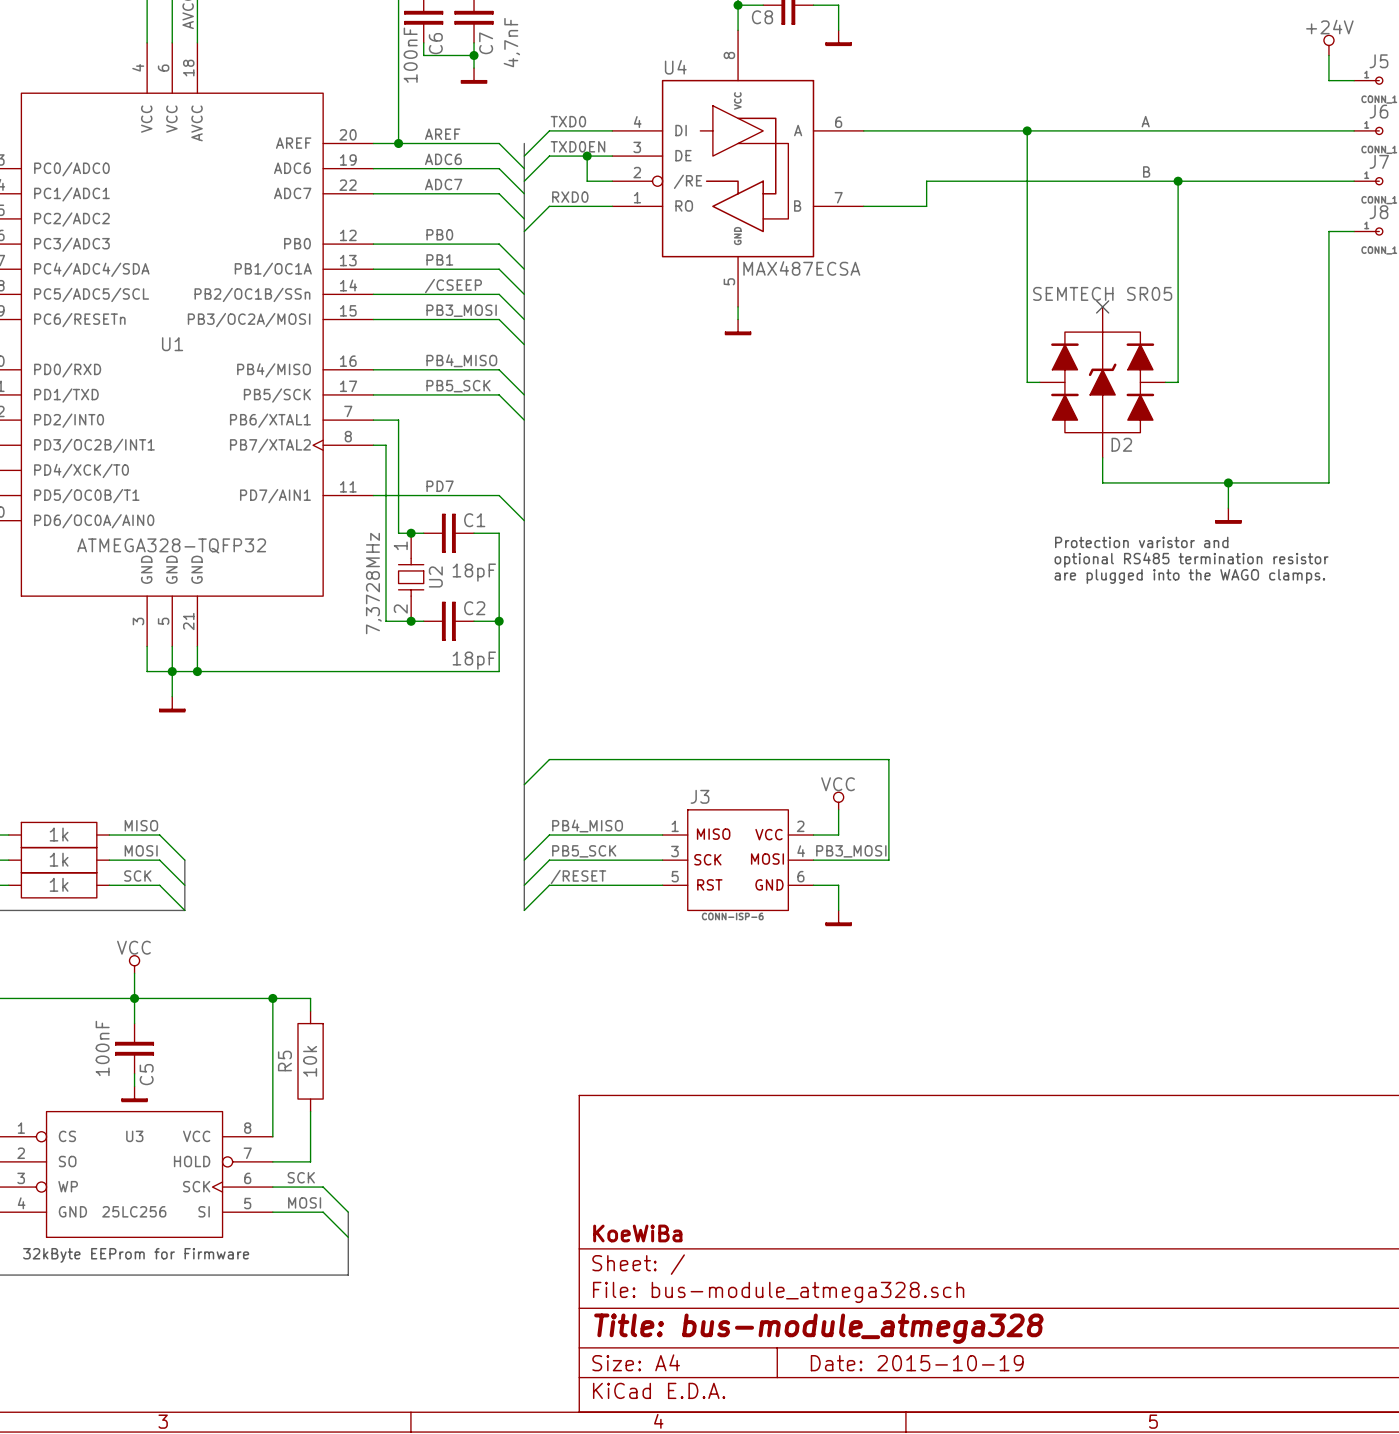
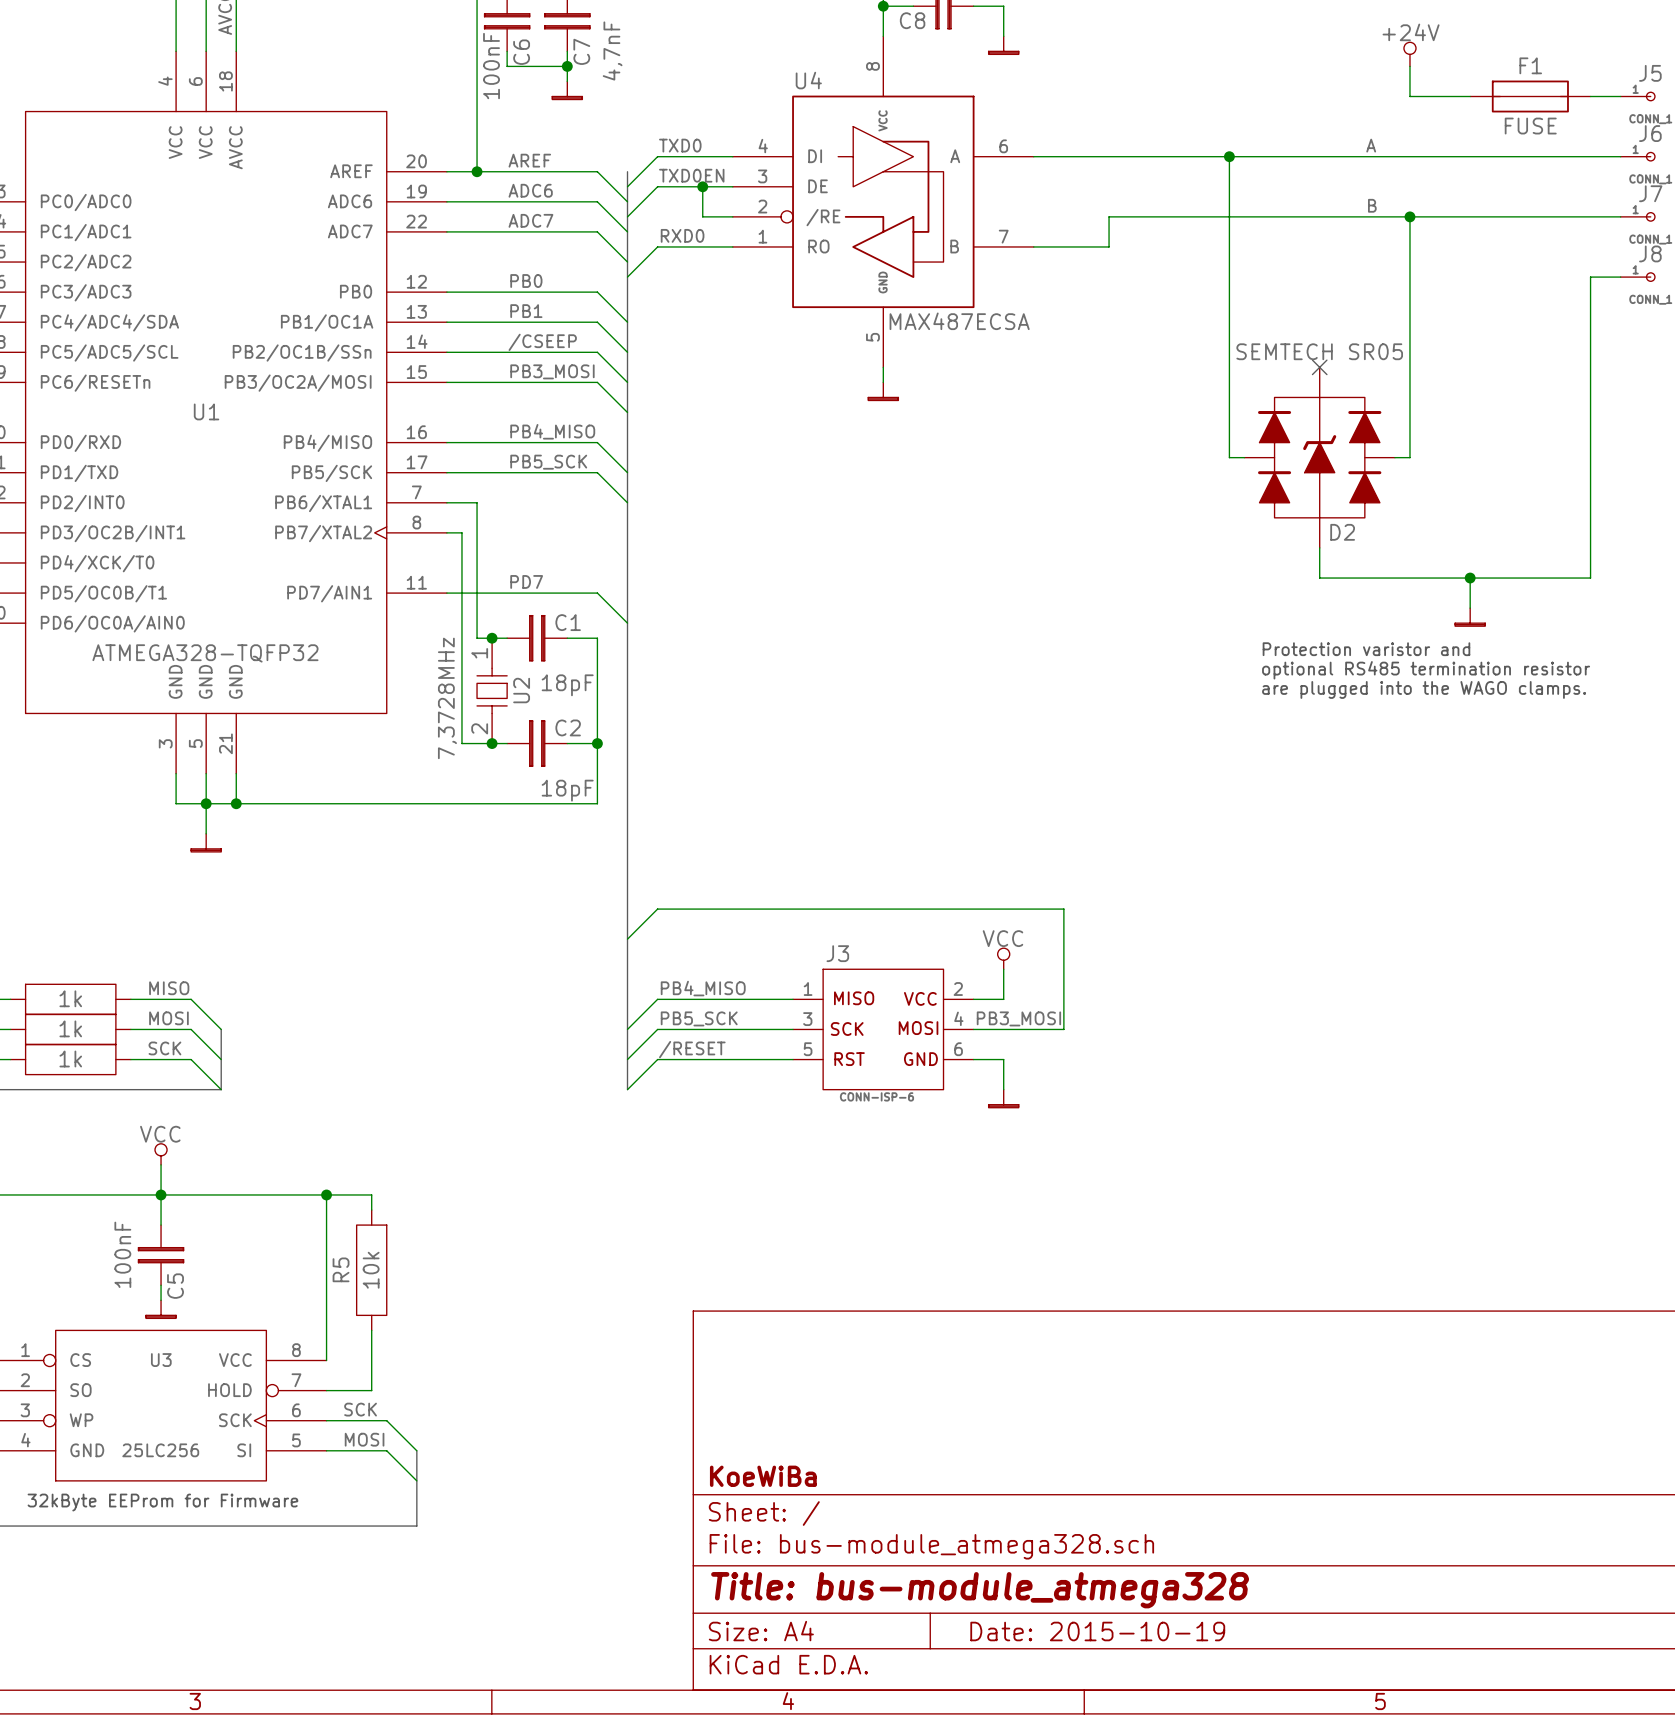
power symbol position: +24V (1328, 45) -> +24V (1409, 54)
wire: none -> (1409, 66) (1409, 96) (1470, 96)
wire: (1328, 55) (1328, 80) -> none
F1: none -> FUSE (1530, 96)

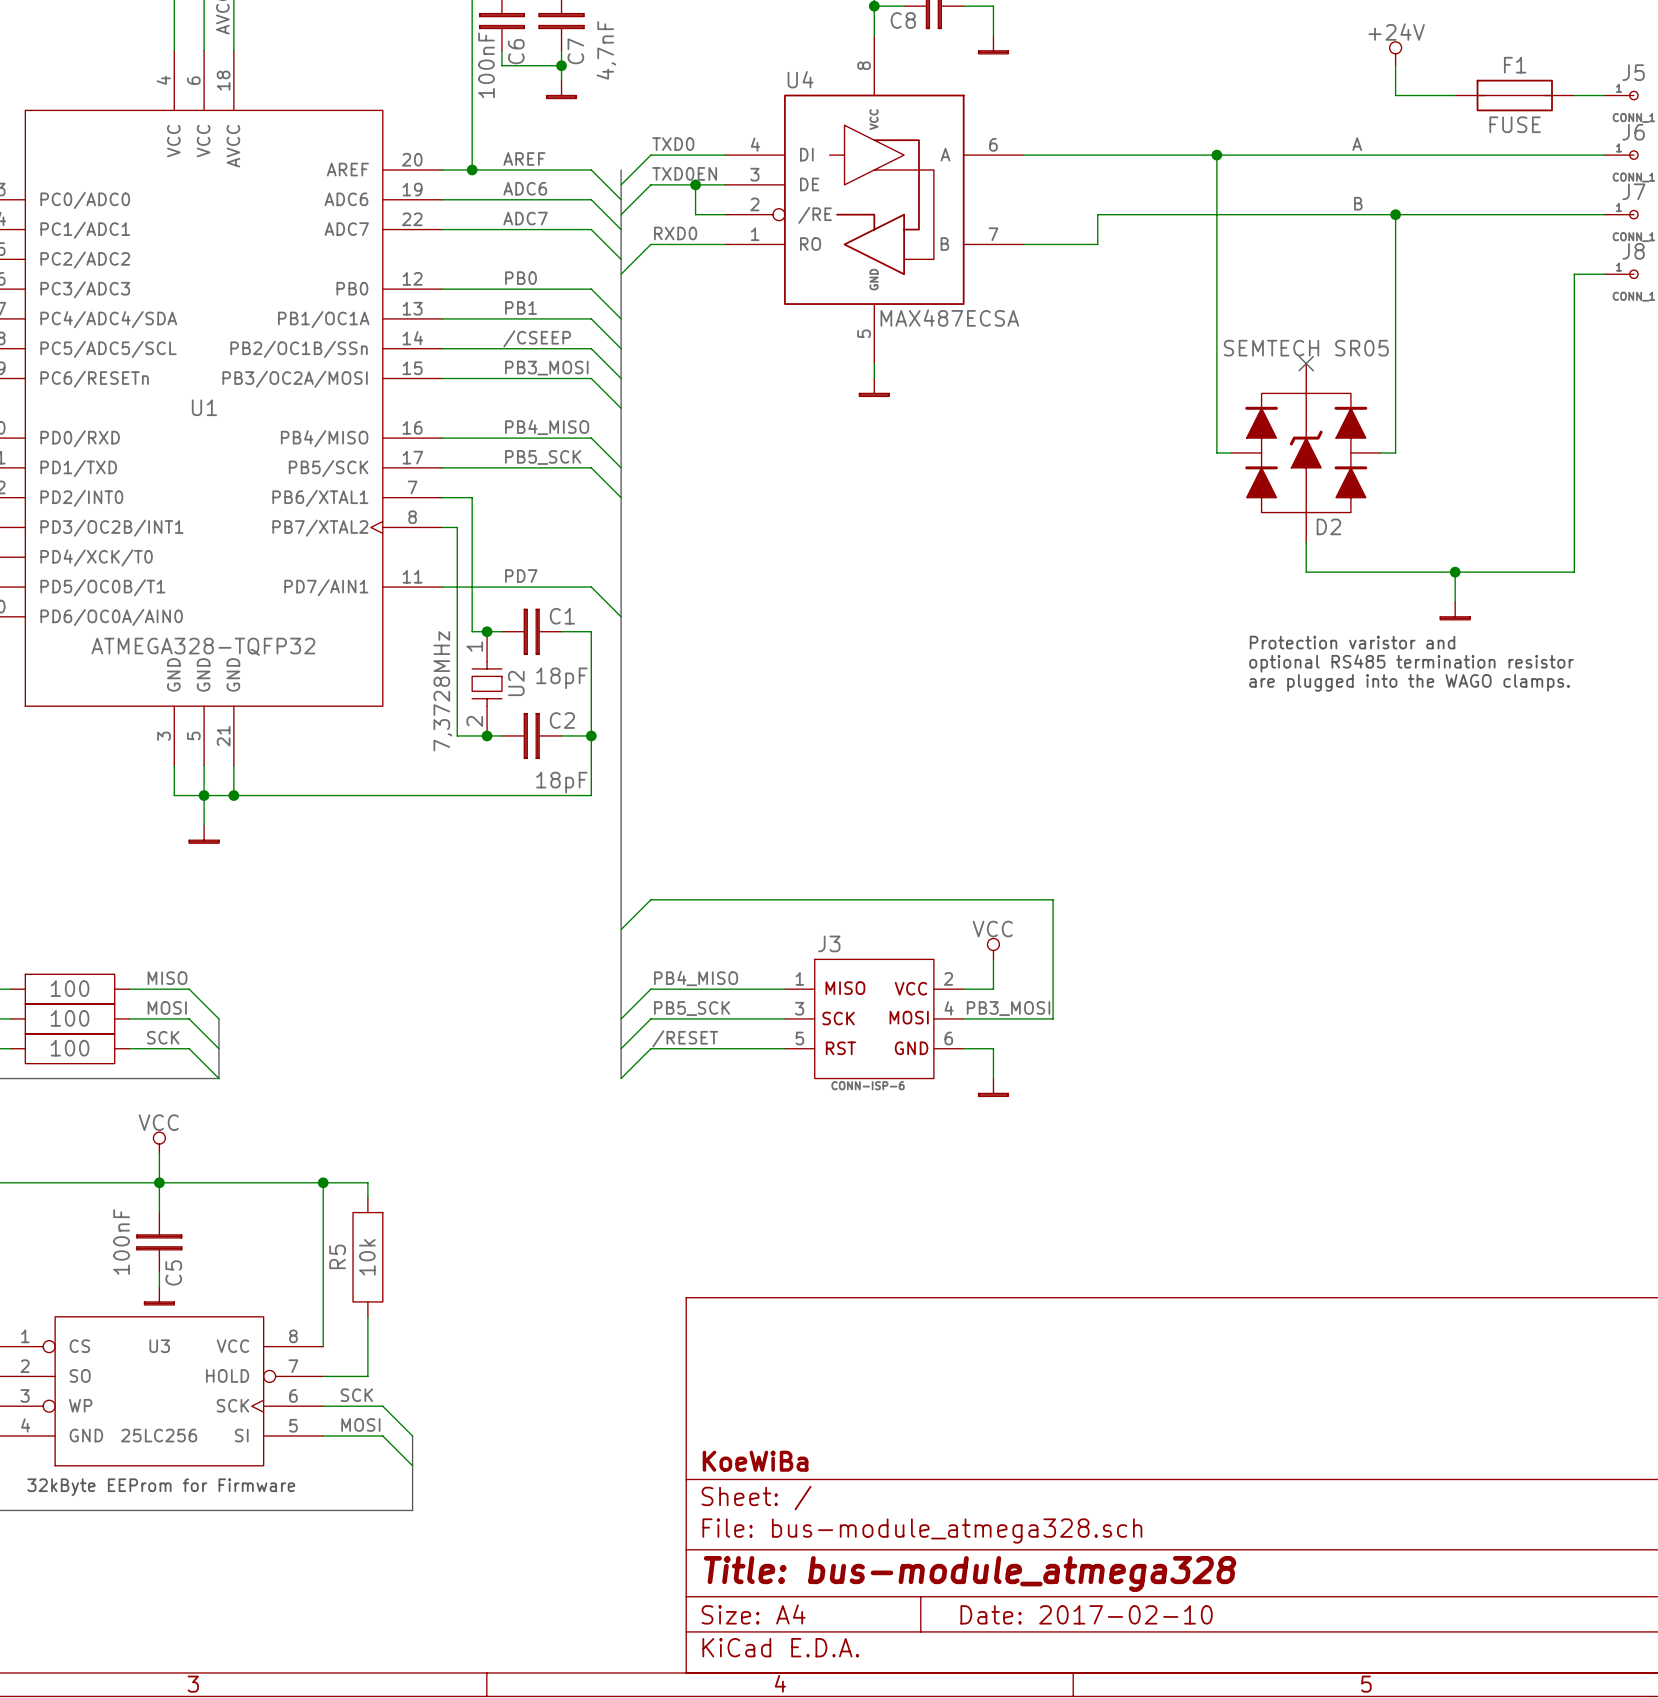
part value: 1k (70, 998) -> 100 (70, 988)
part value: 1k (70, 1028) -> 100 (70, 1018)
part value: 1k (70, 1058) -> 100 (70, 1048)
title block: Date: 2015-10-19 (1097, 1631) -> Date: 2017-02-10 (1086, 1614)

